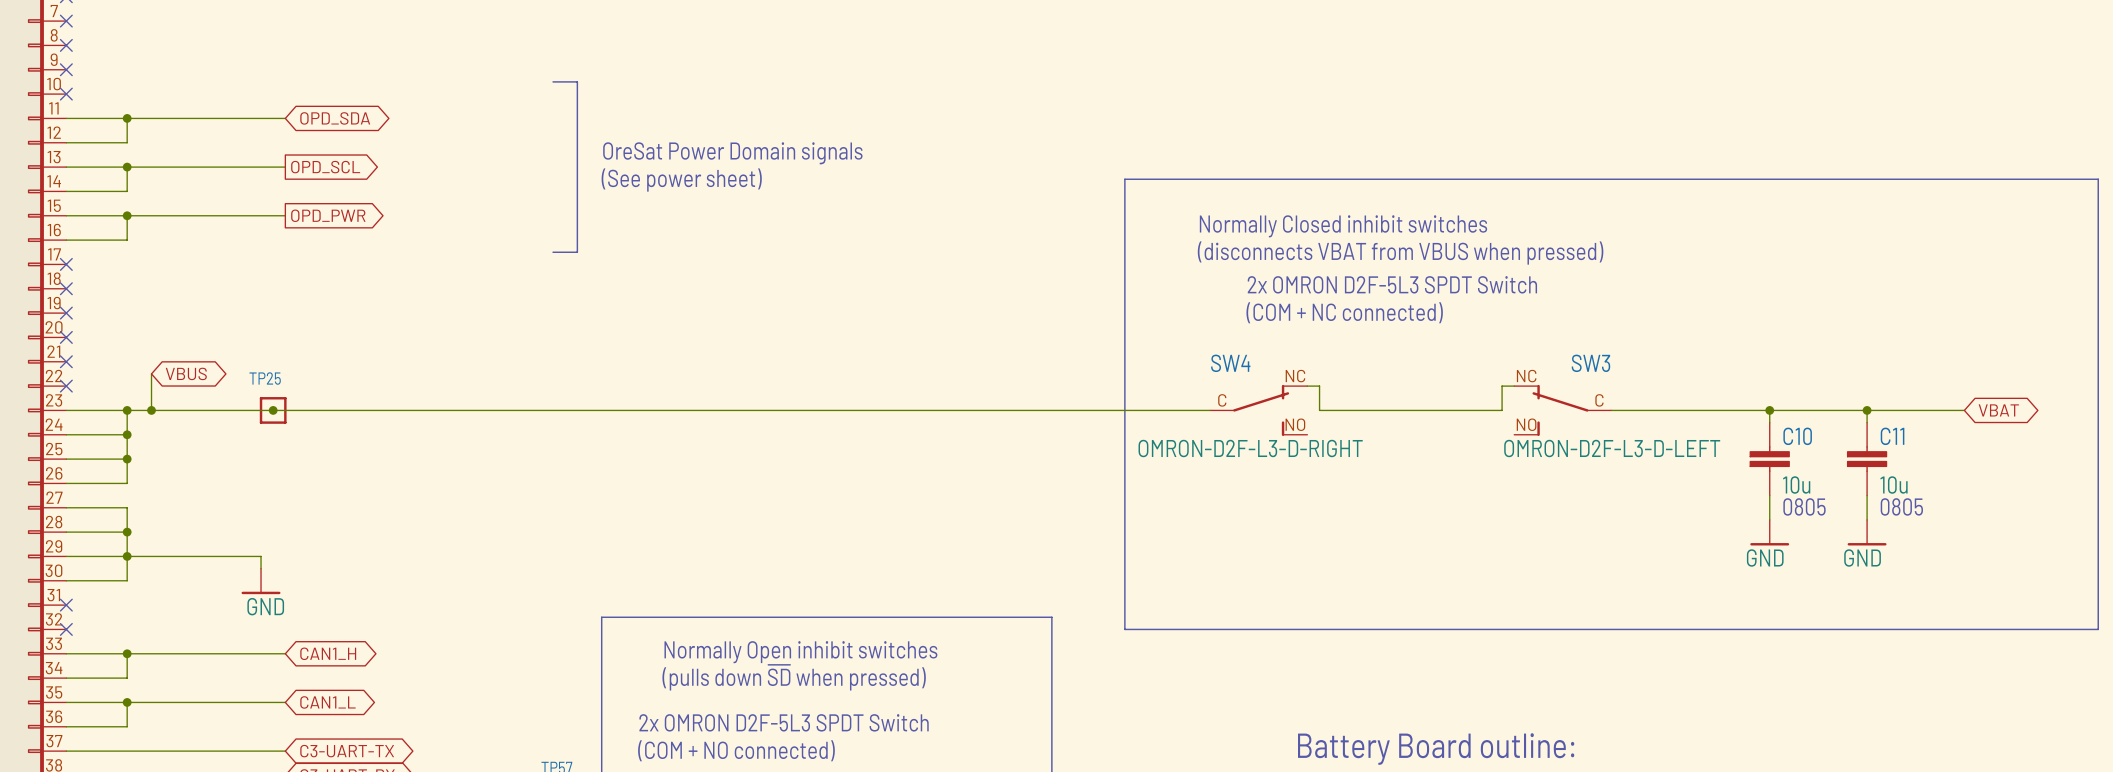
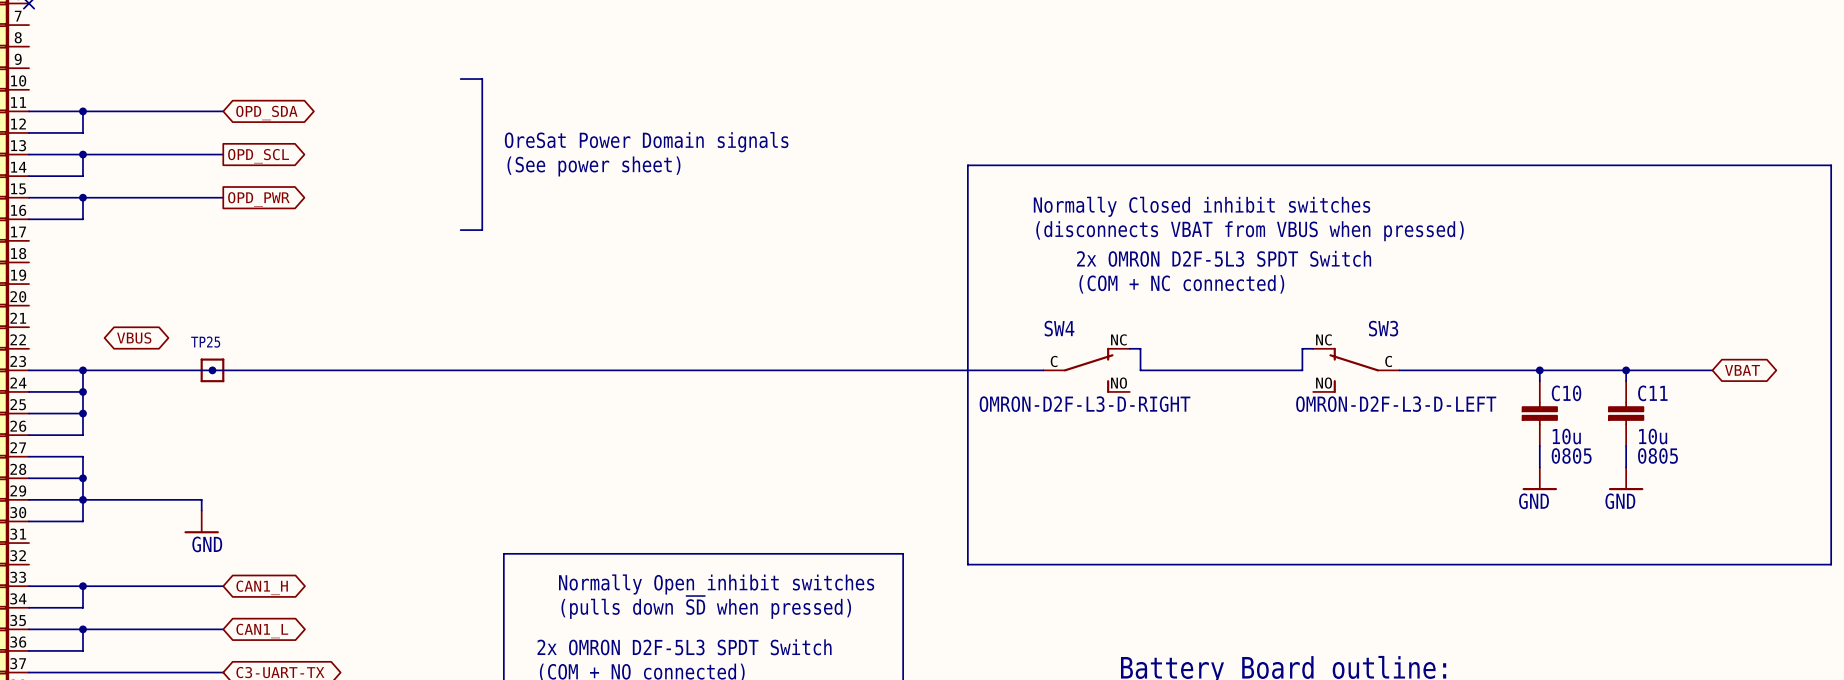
no-connect mark: (66, 21) -> none
no-connect mark: (66, 45) -> none
no-connect mark: (66, 69) -> none
no-connect mark: (66, 94) -> none
no-connect mark: (66, 264) -> none
no-connect mark: (66, 288) -> none
no-connect mark: (66, 313) -> none
no-connect mark: (66, 337) -> none
no-connect mark: (66, 361) -> none
wire: (151, 373) (151, 410) -> none
no-connect mark: (66, 386) -> none
junction: (151, 410) -> none
no-connect mark: (66, 605) -> none
no-connect mark: (66, 629) -> none

